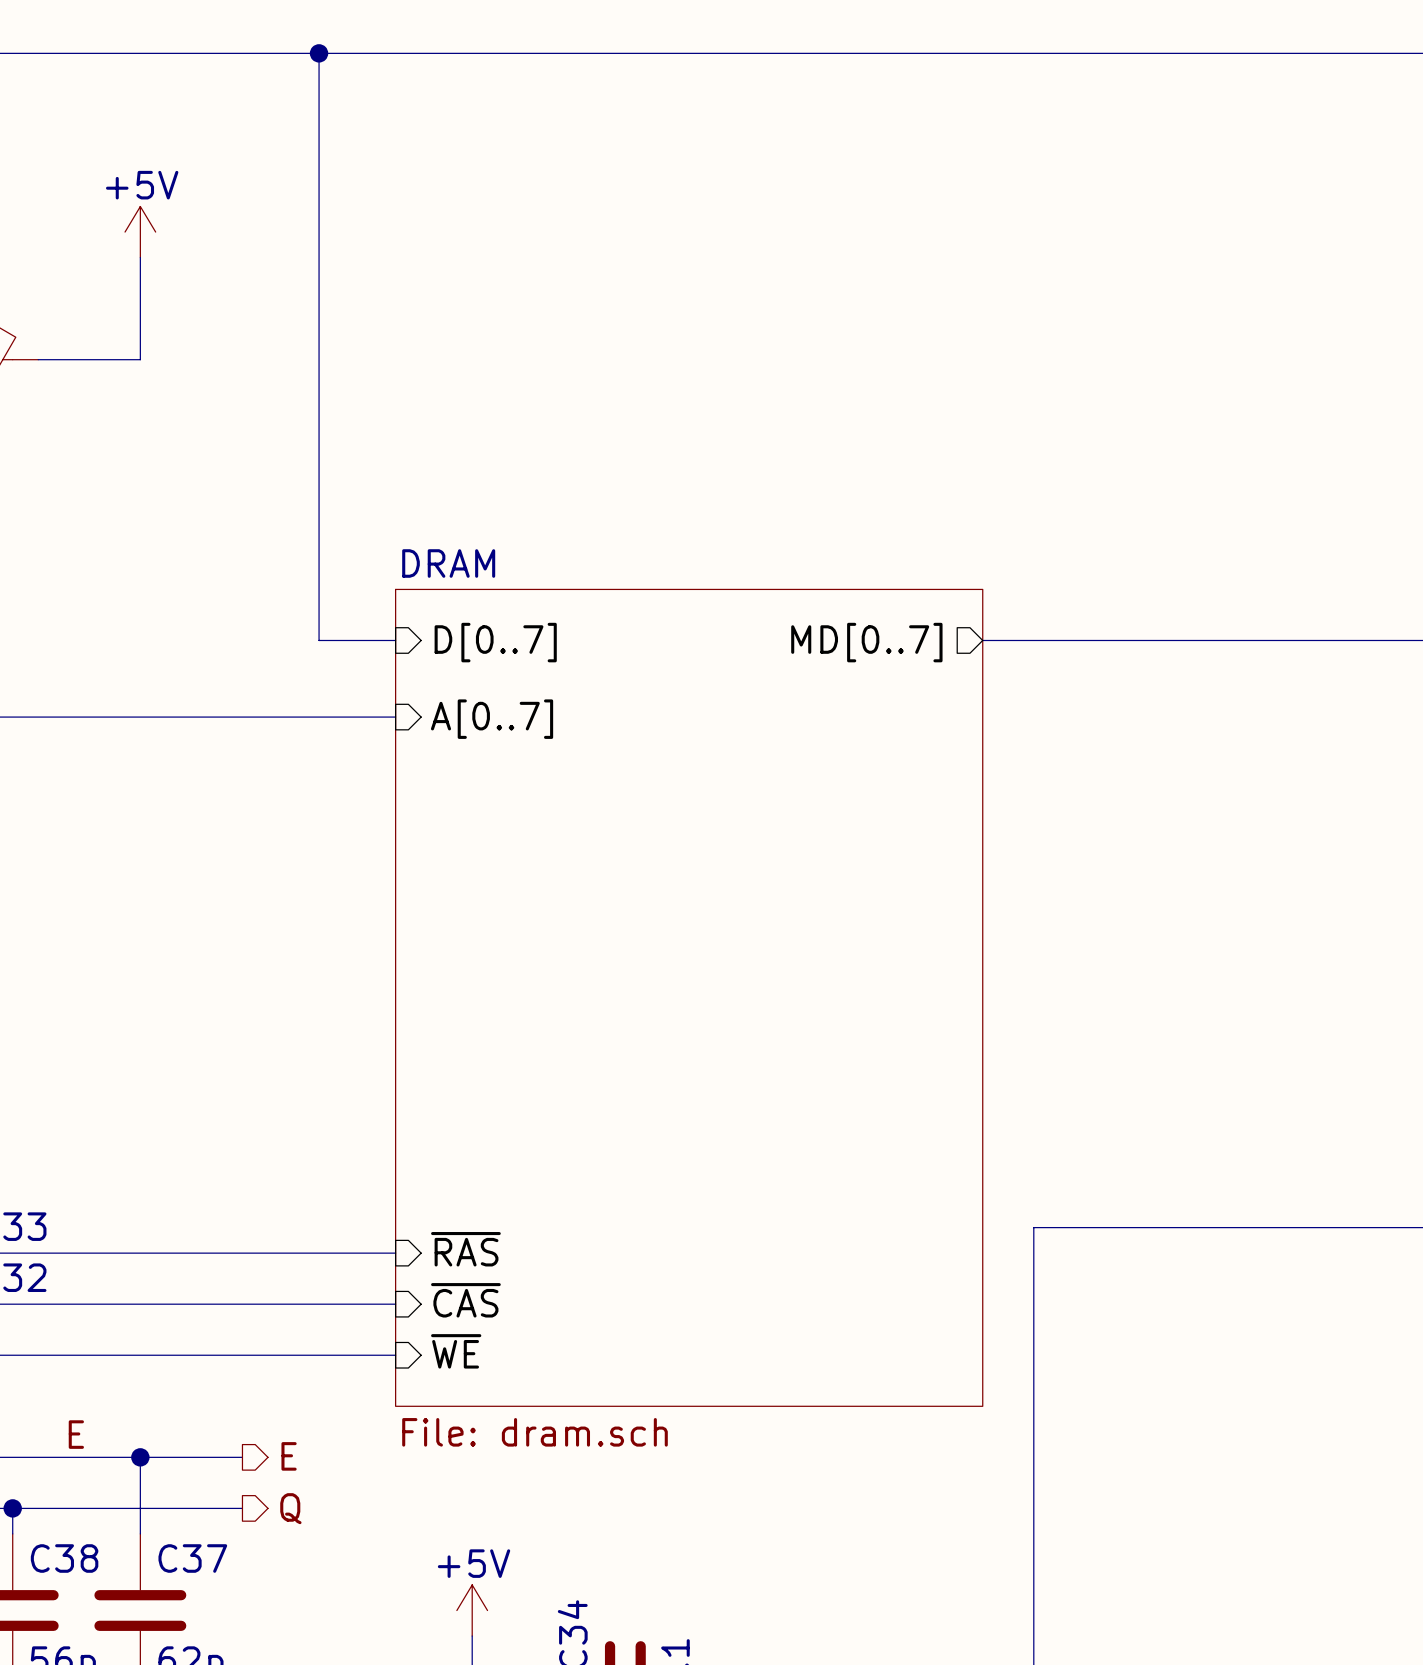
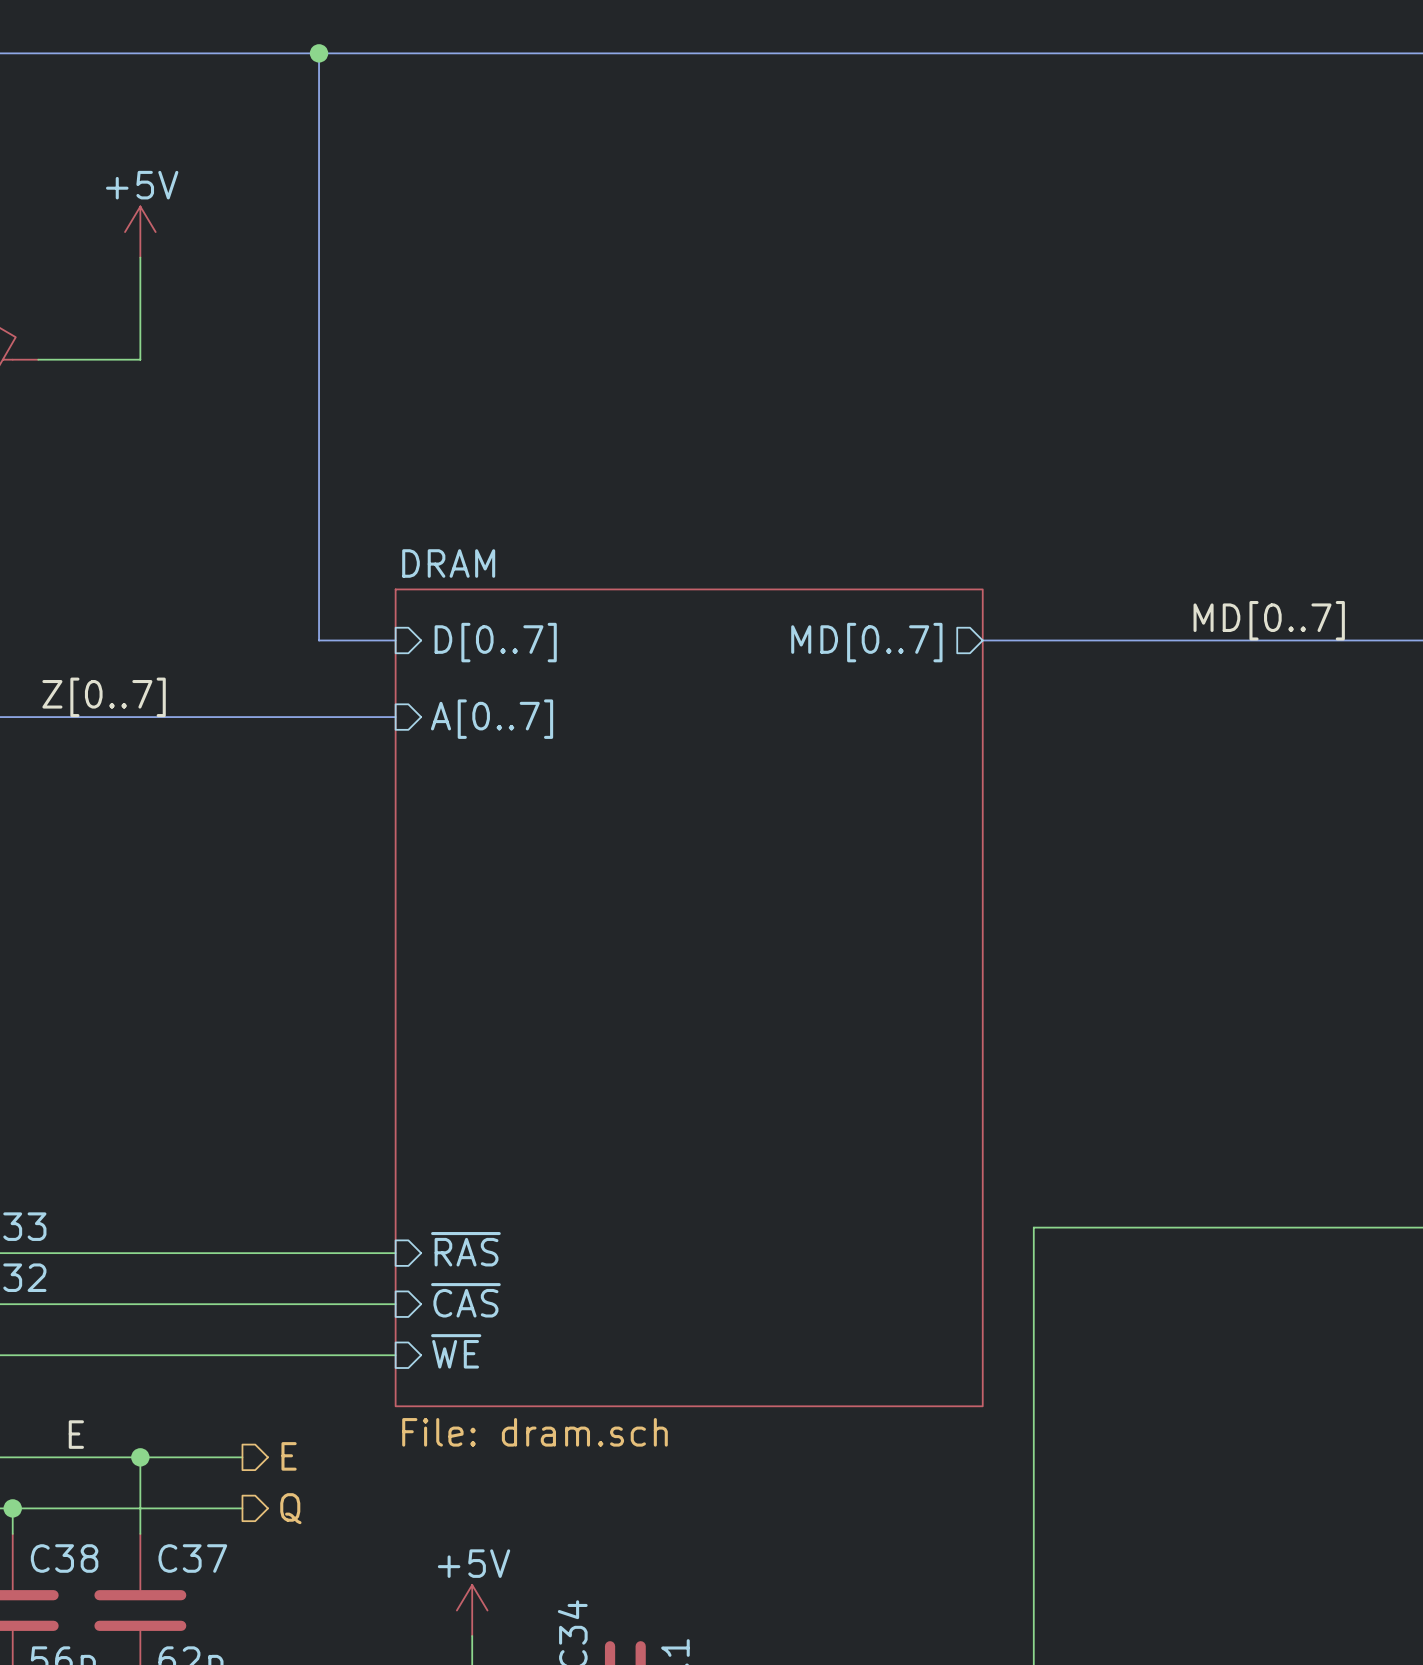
label: none -> MD[0..7] (1269, 620)
label: none -> Z[0..7] (104, 697)

